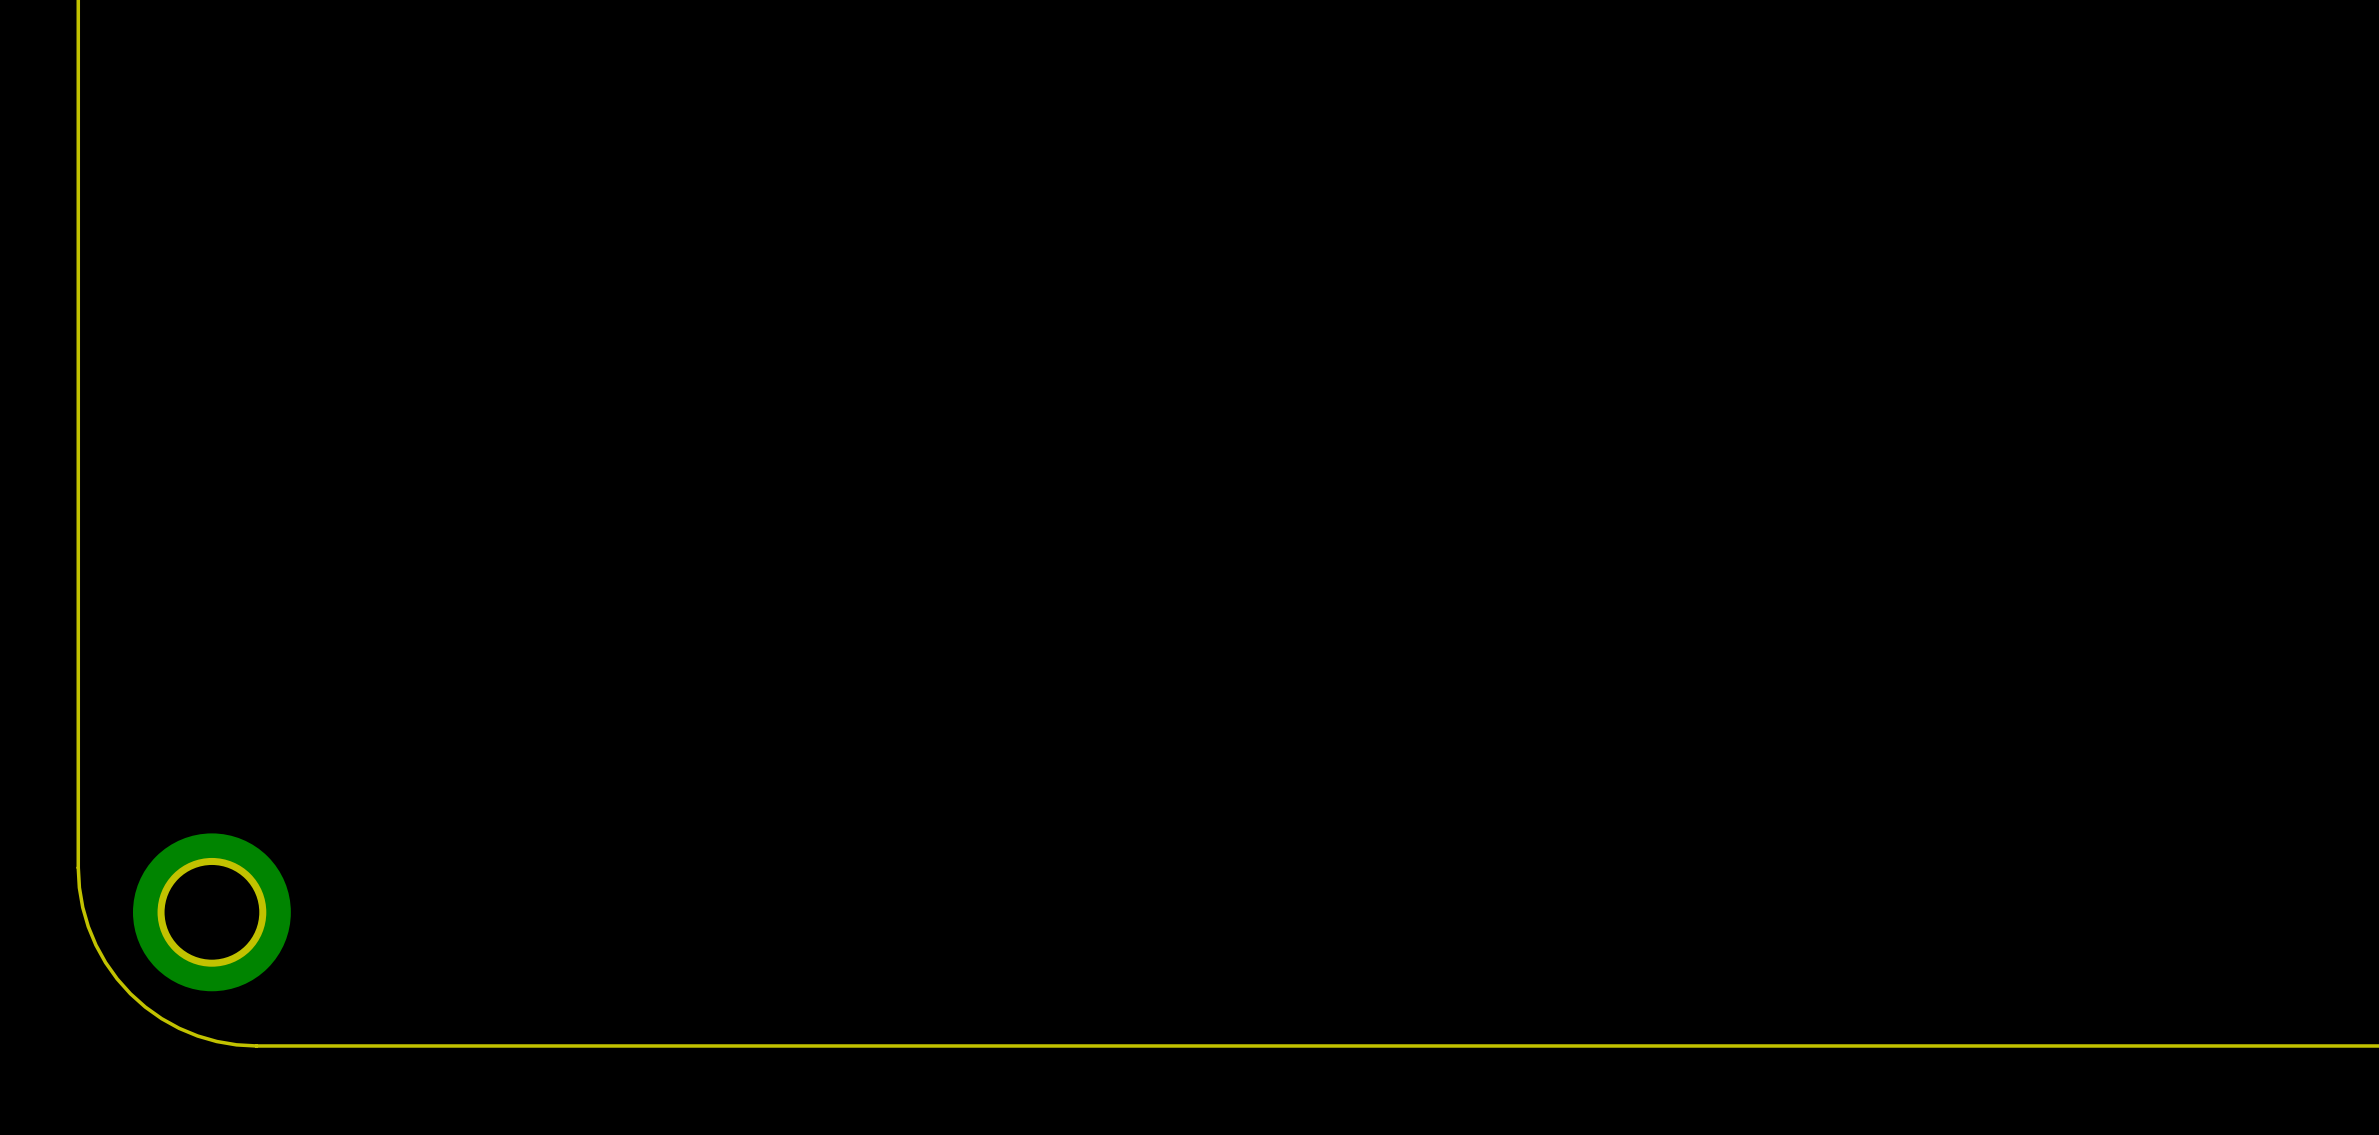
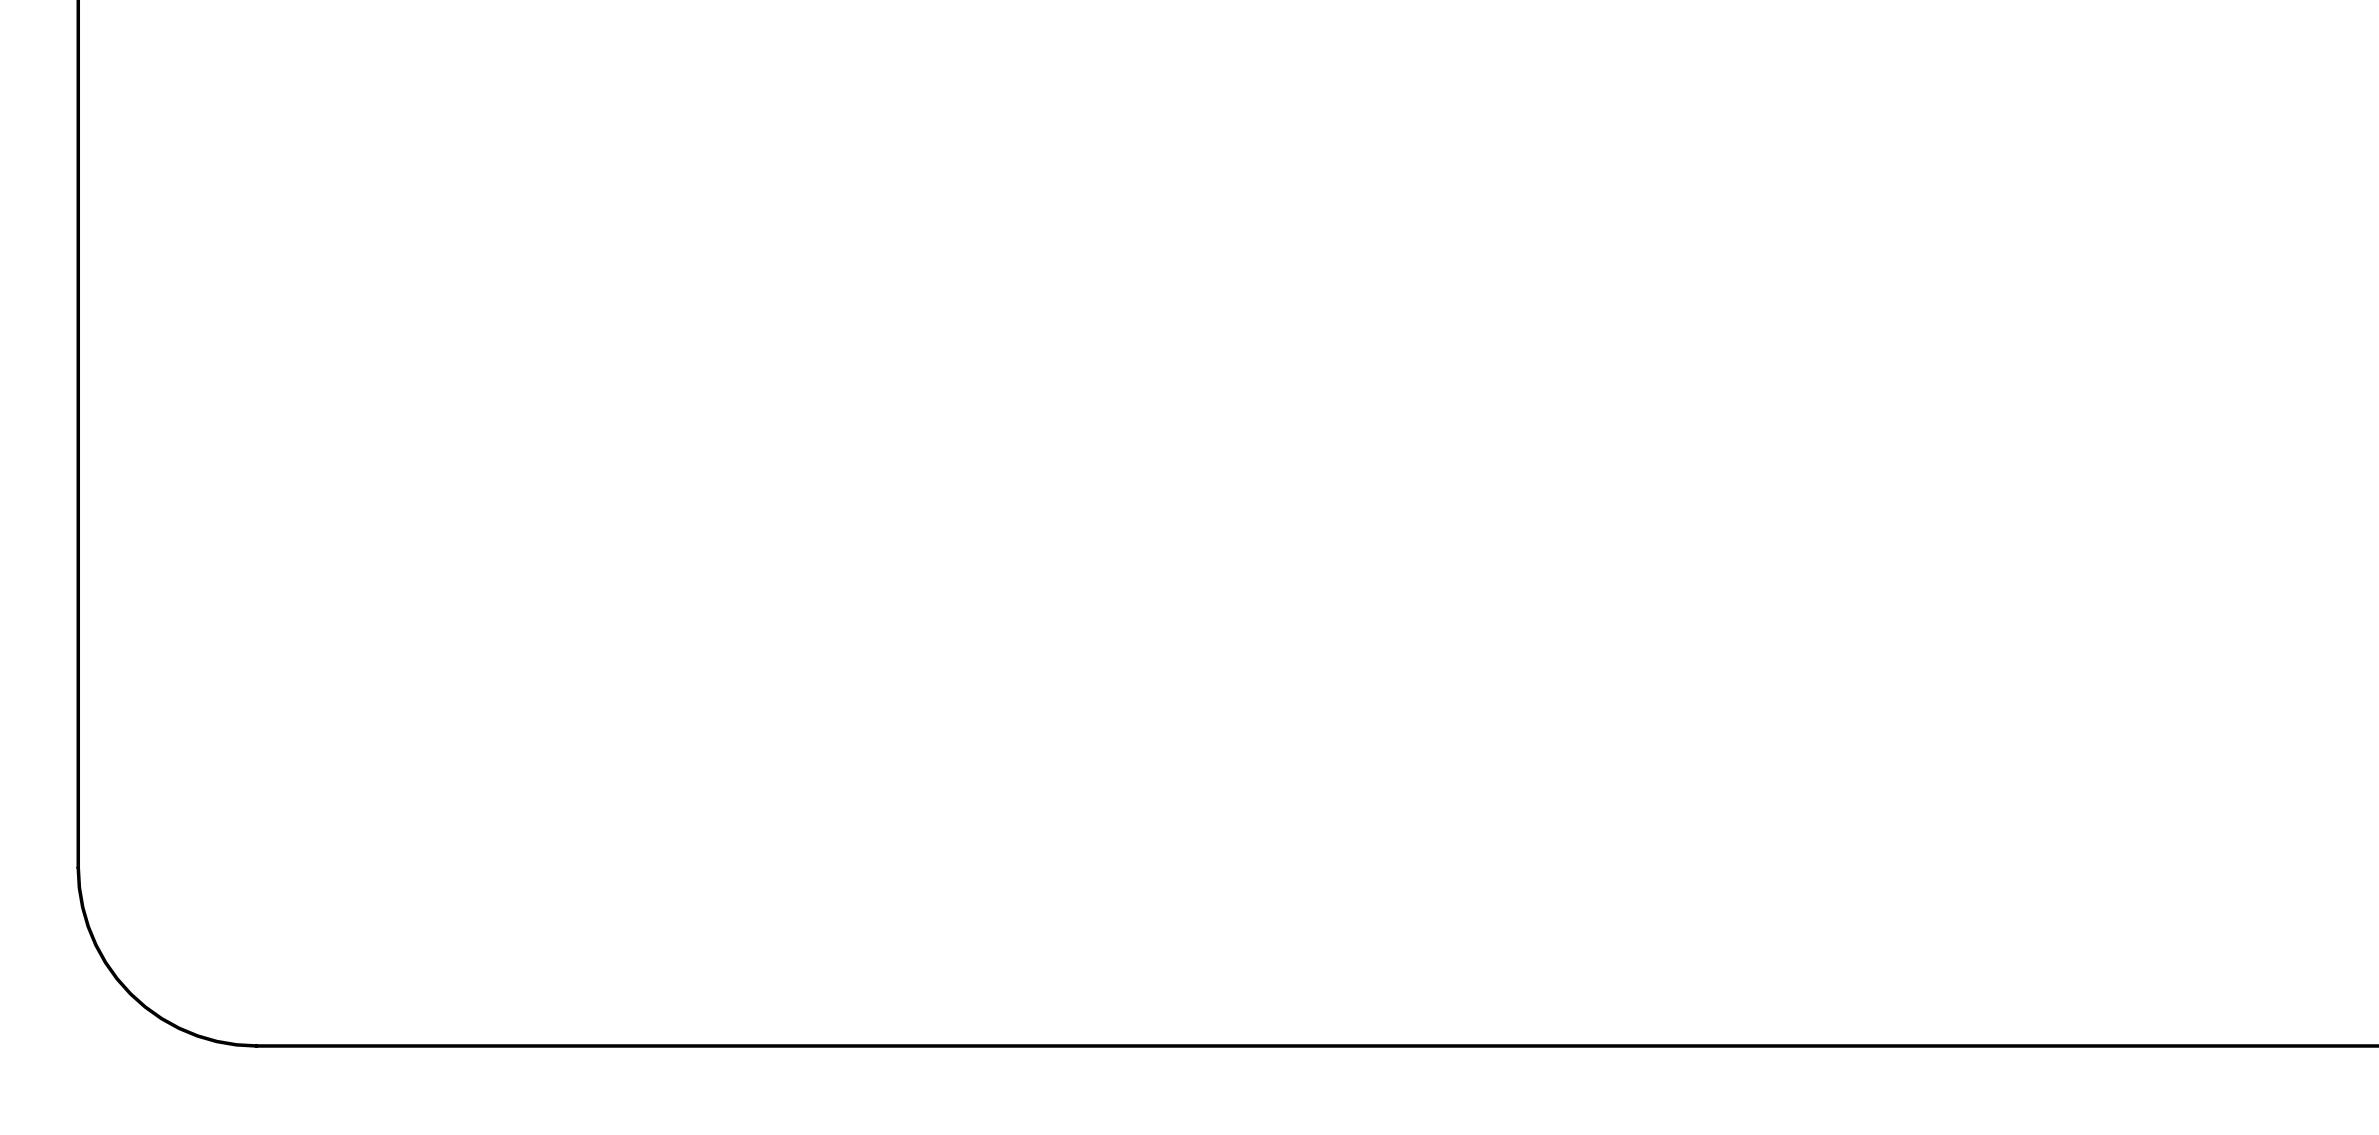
part: (211, 912) -> none

